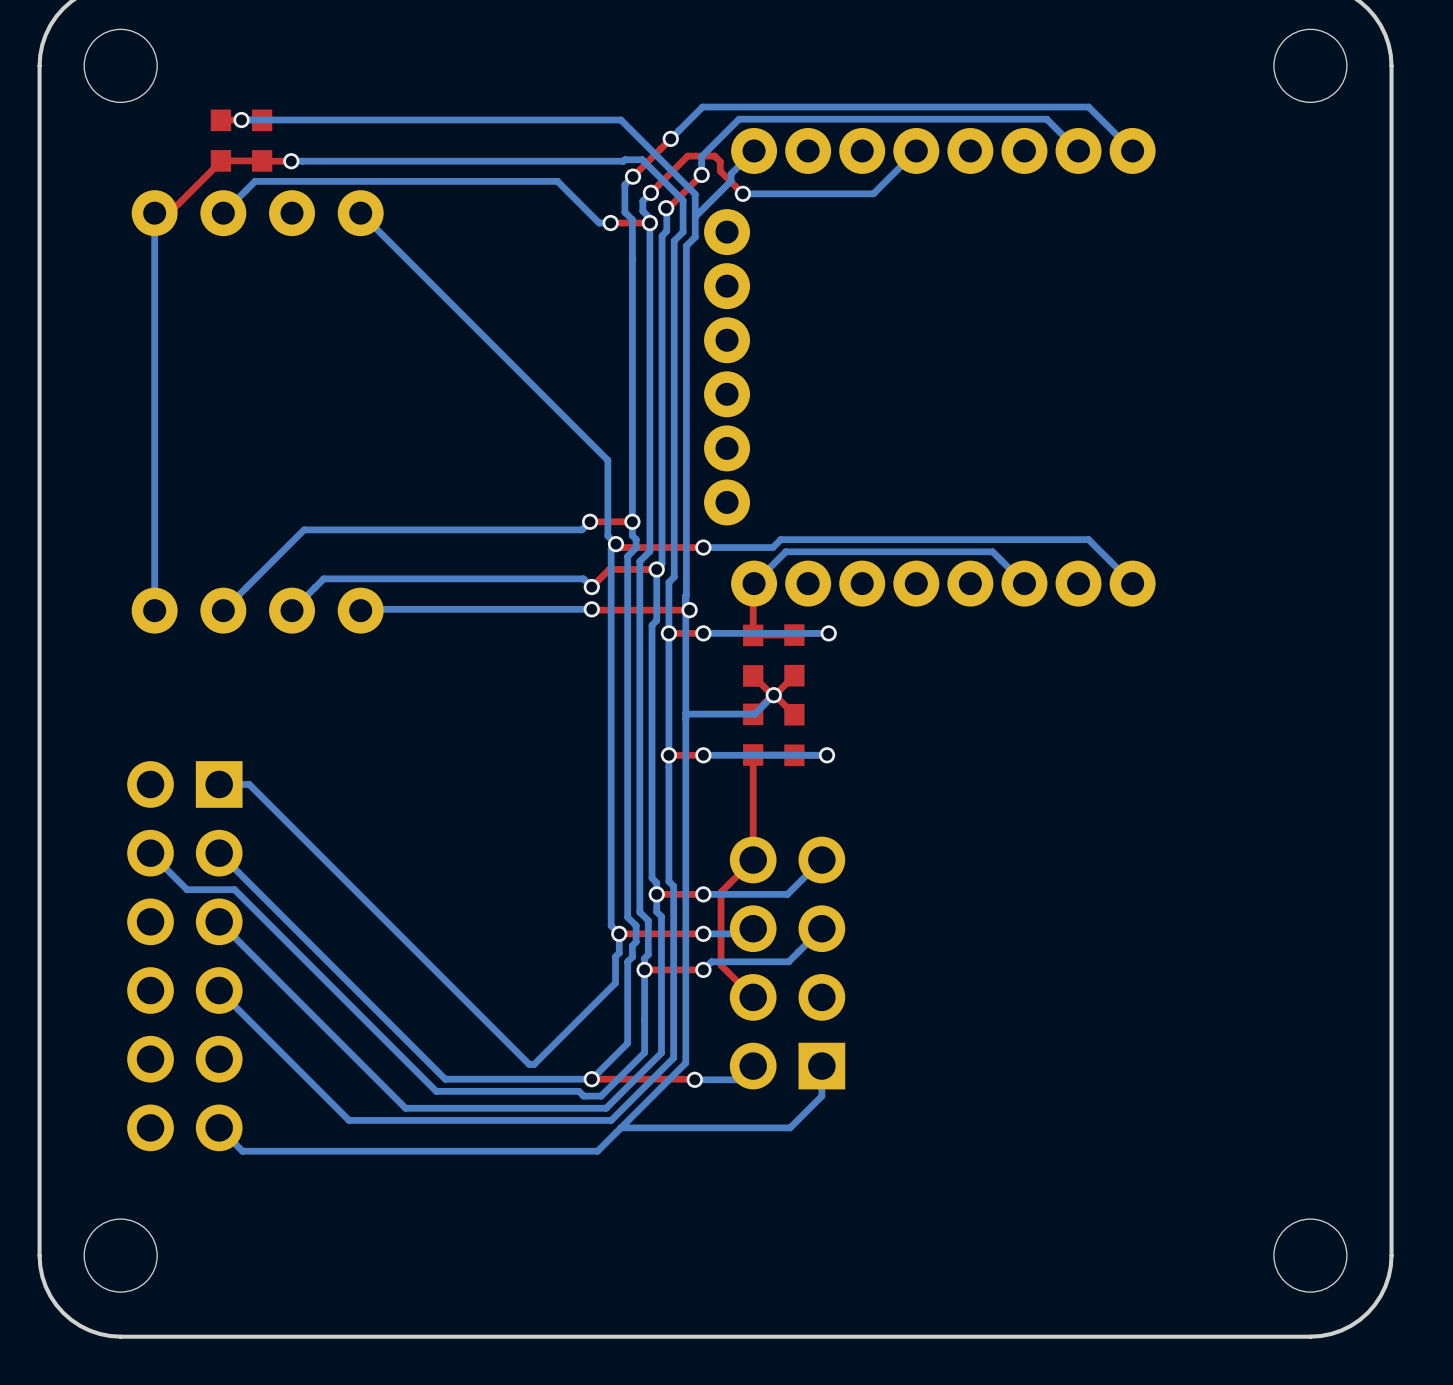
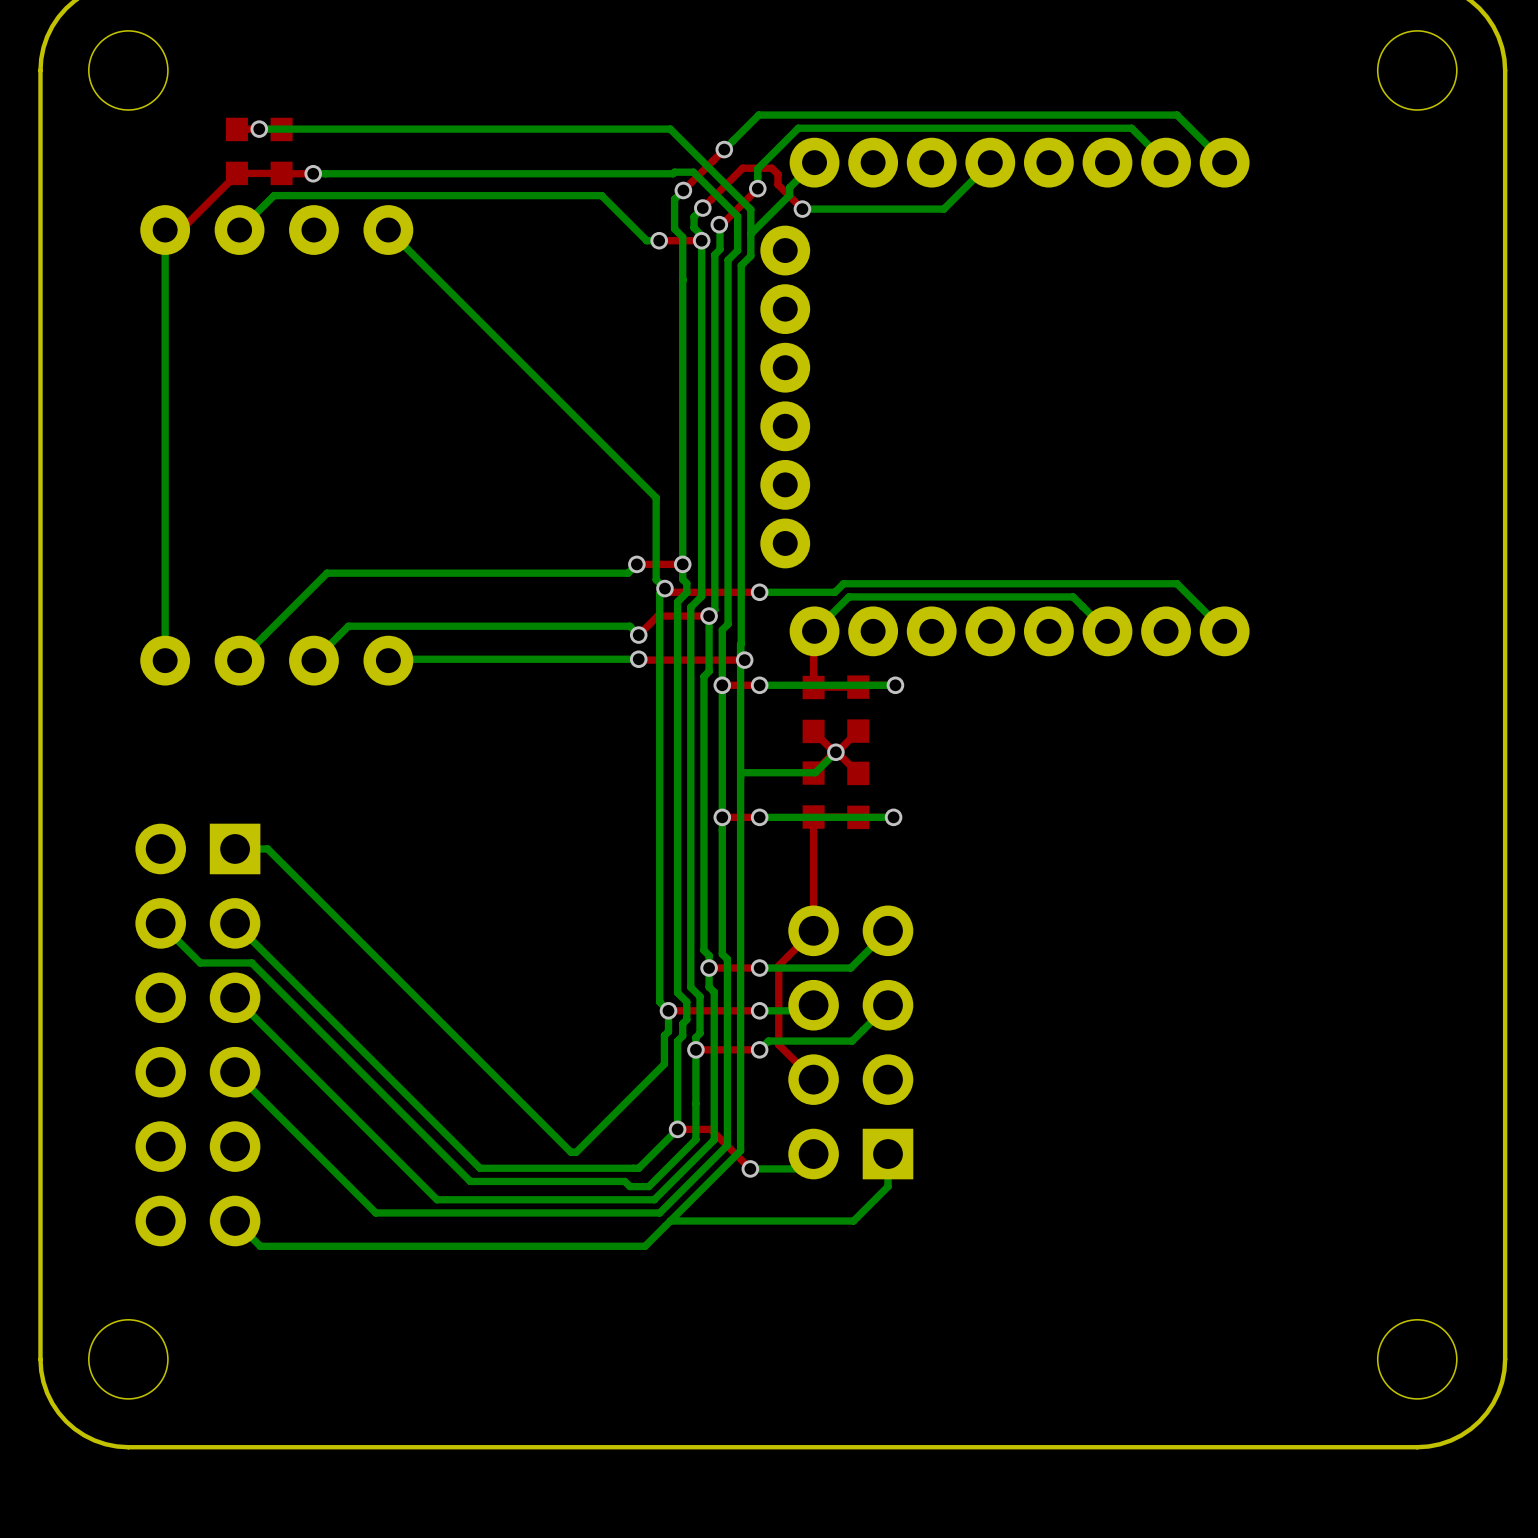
via position: (591, 1079) -> (677, 1129)
top track: (694, 1079) (591, 1079) -> (749, 1168) (710, 1129) (677, 1129)

